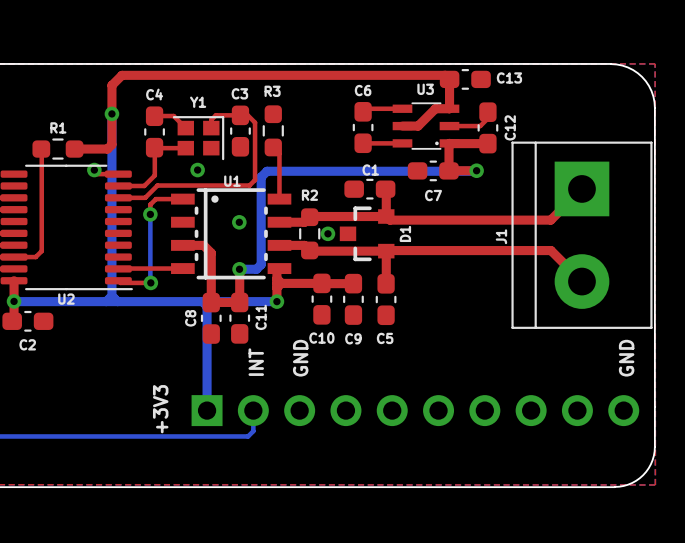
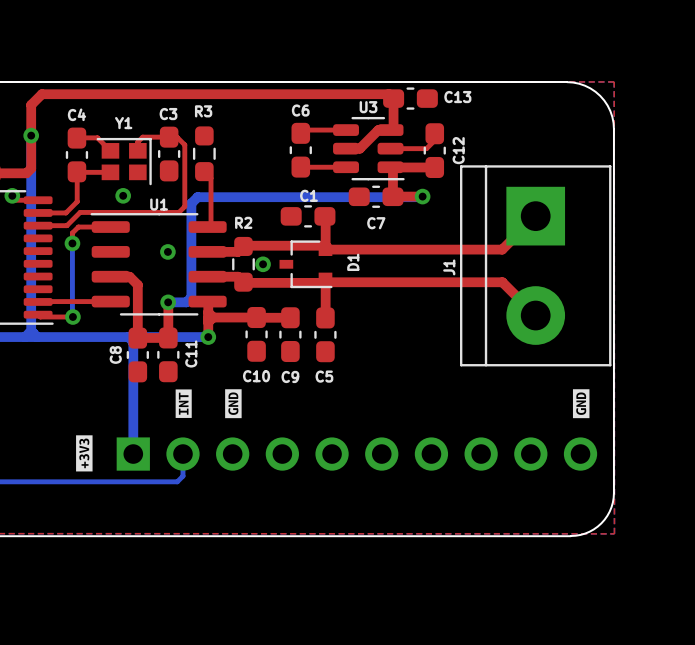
U3 footprint: [392, 102, 460, 150] -> [333, 116, 405, 181]
U1 footprint: [171, 188, 292, 280] -> [90, 213, 227, 316]
D1 footprint: [339, 206, 395, 262] -> [279, 240, 333, 289]
drawing: none -> [175, 389, 192, 418]
drawing: none -> [225, 389, 242, 419]
drawing: none -> [572, 389, 590, 419]
text: GND (300, 358) -> none
text: GND (626, 358) -> none
text: INT (256, 362) -> none
drawing: none -> [76, 435, 93, 472]
text: +3V3 (160, 409) -> none

